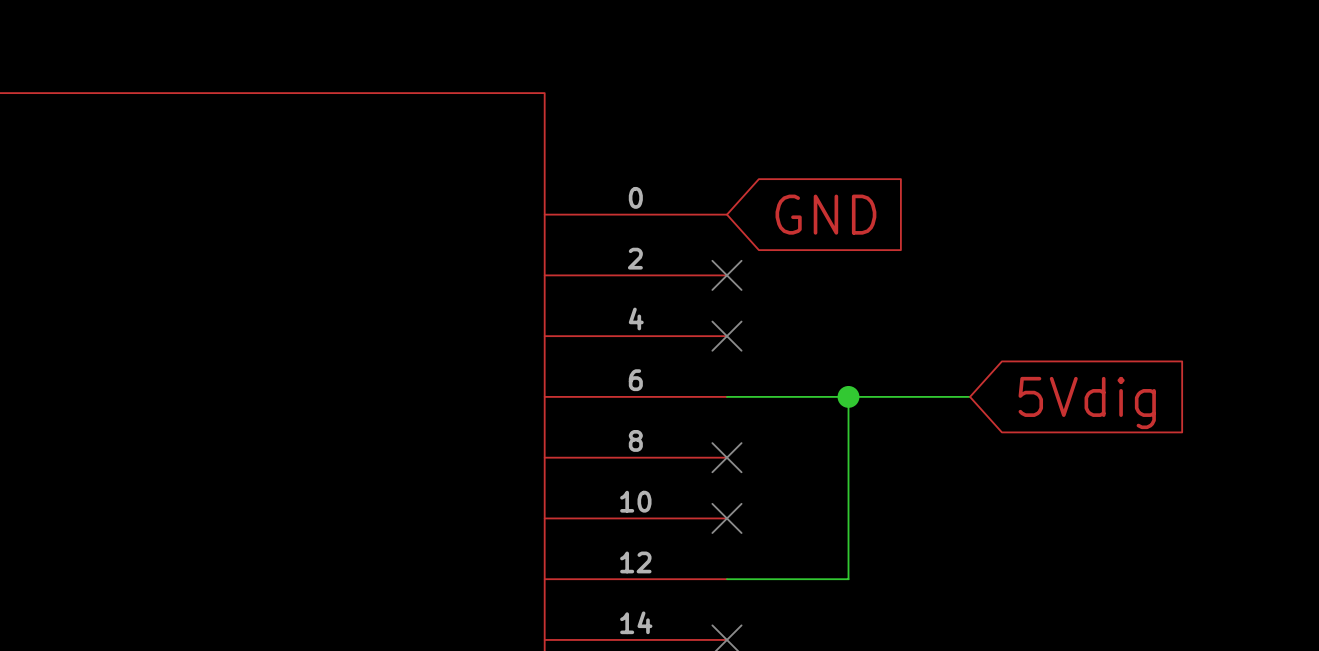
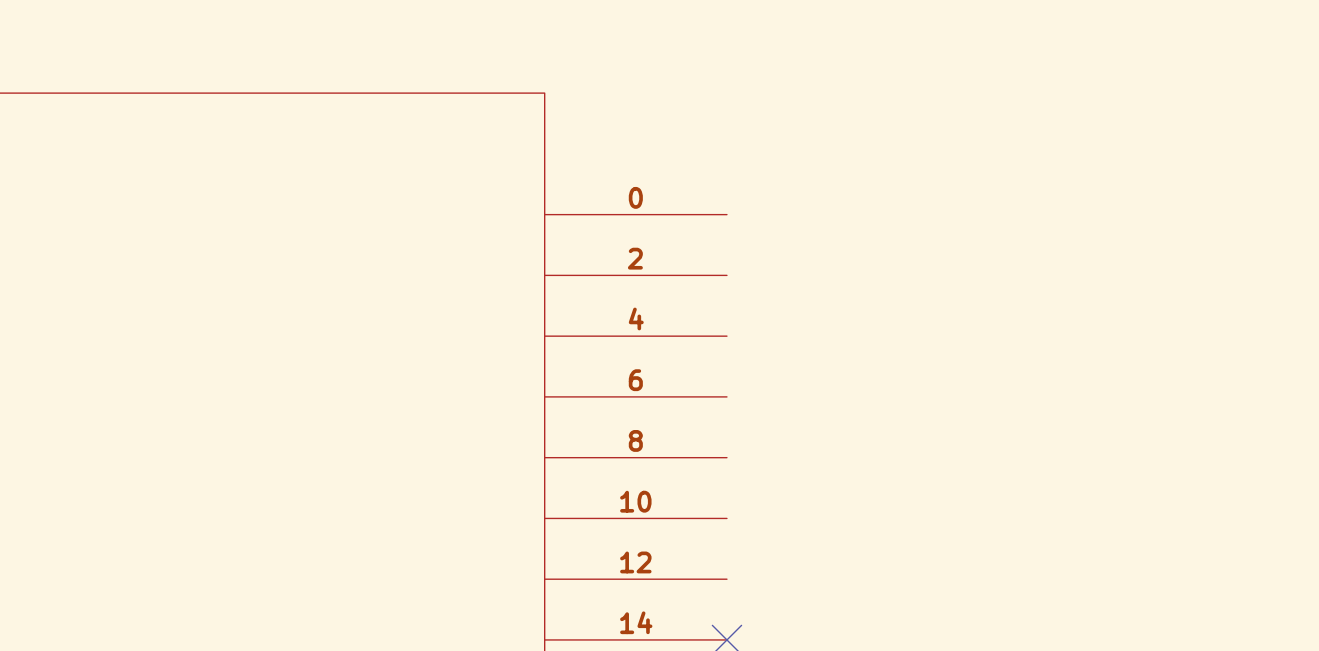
global label: GND (825, 214) -> none
no-connect mark: (726, 275) -> none
no-connect mark: (726, 336) -> none
wire: (726, 396) (970, 396) -> none
wire: (848, 396) (848, 579) (726, 579) -> none
junction: (848, 396) -> none
global label: 5Vdig (1087, 402) -> none
no-connect mark: (726, 457) -> none
no-connect mark: (726, 518) -> none

